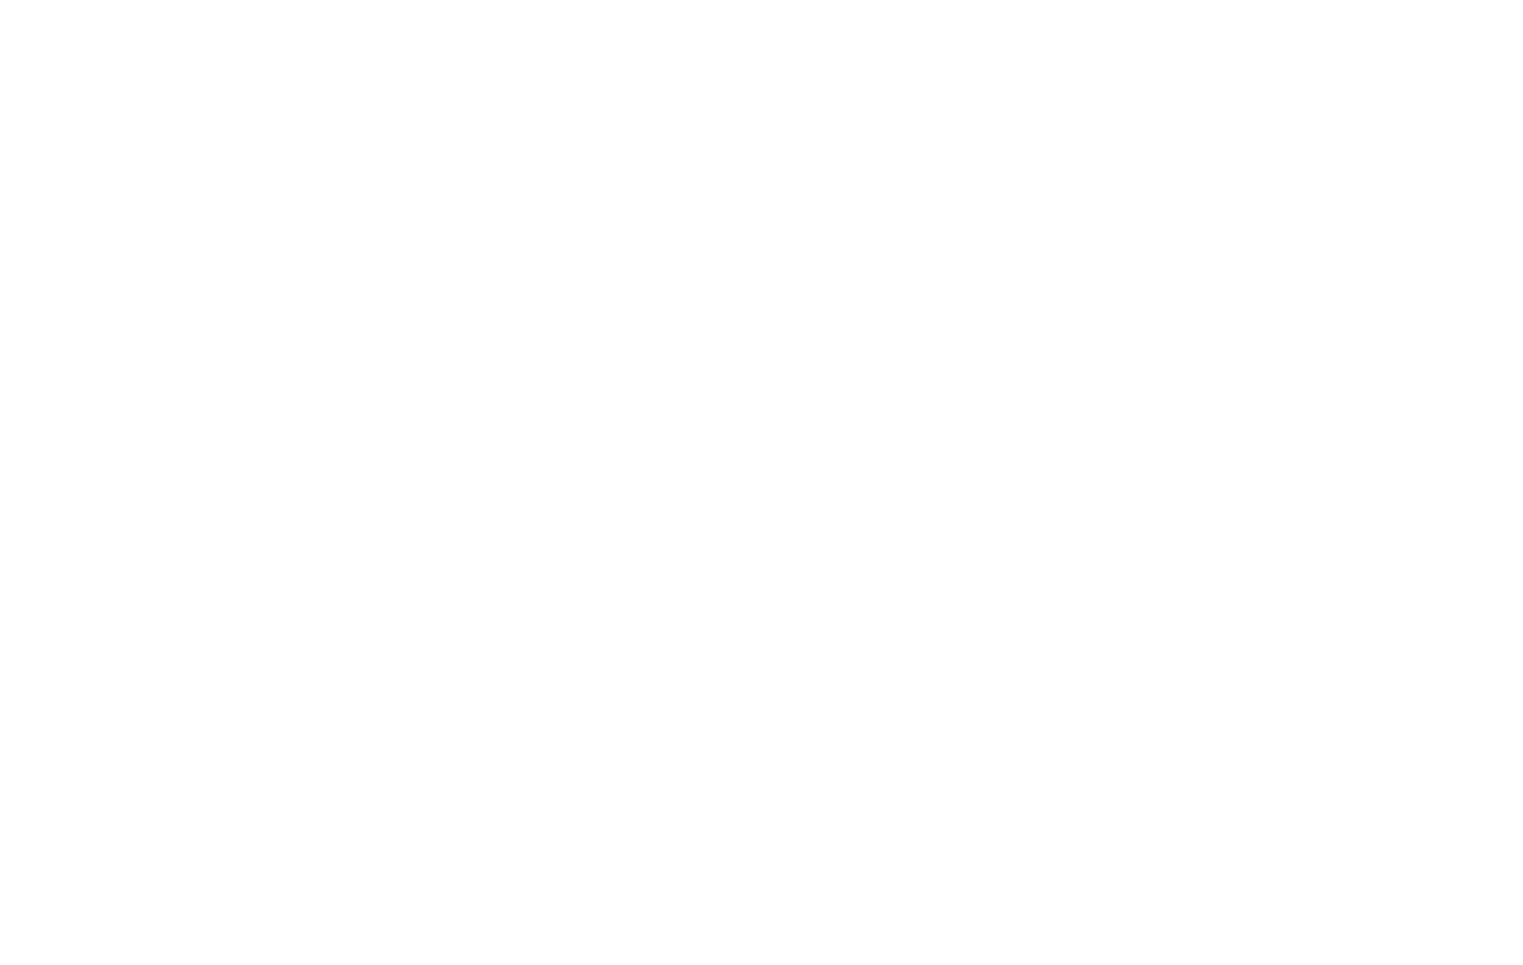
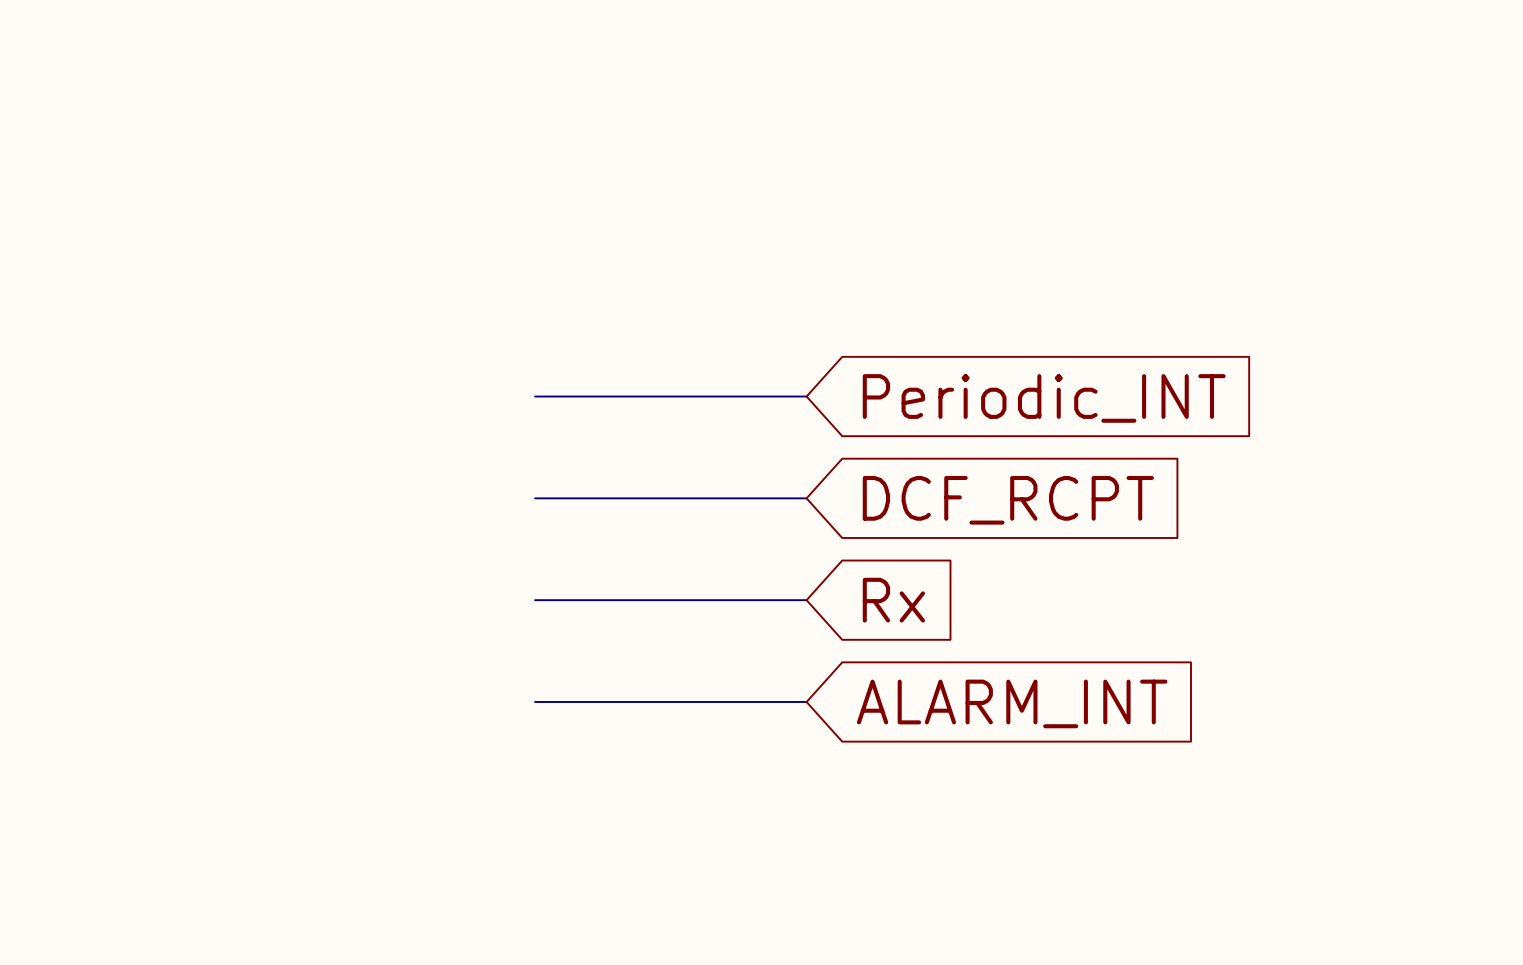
wire: none -> (535, 396) (806, 396)
global label: none -> Periodic_INT (1044, 398)
wire: none -> (535, 498) (806, 498)
global label: none -> DCF_RCPT (1008, 500)
wire: none -> (535, 600) (806, 600)
global label: none -> Rx (893, 600)
wire: none -> (535, 701) (806, 701)
global label: none -> ALARM_INT (1012, 703)

